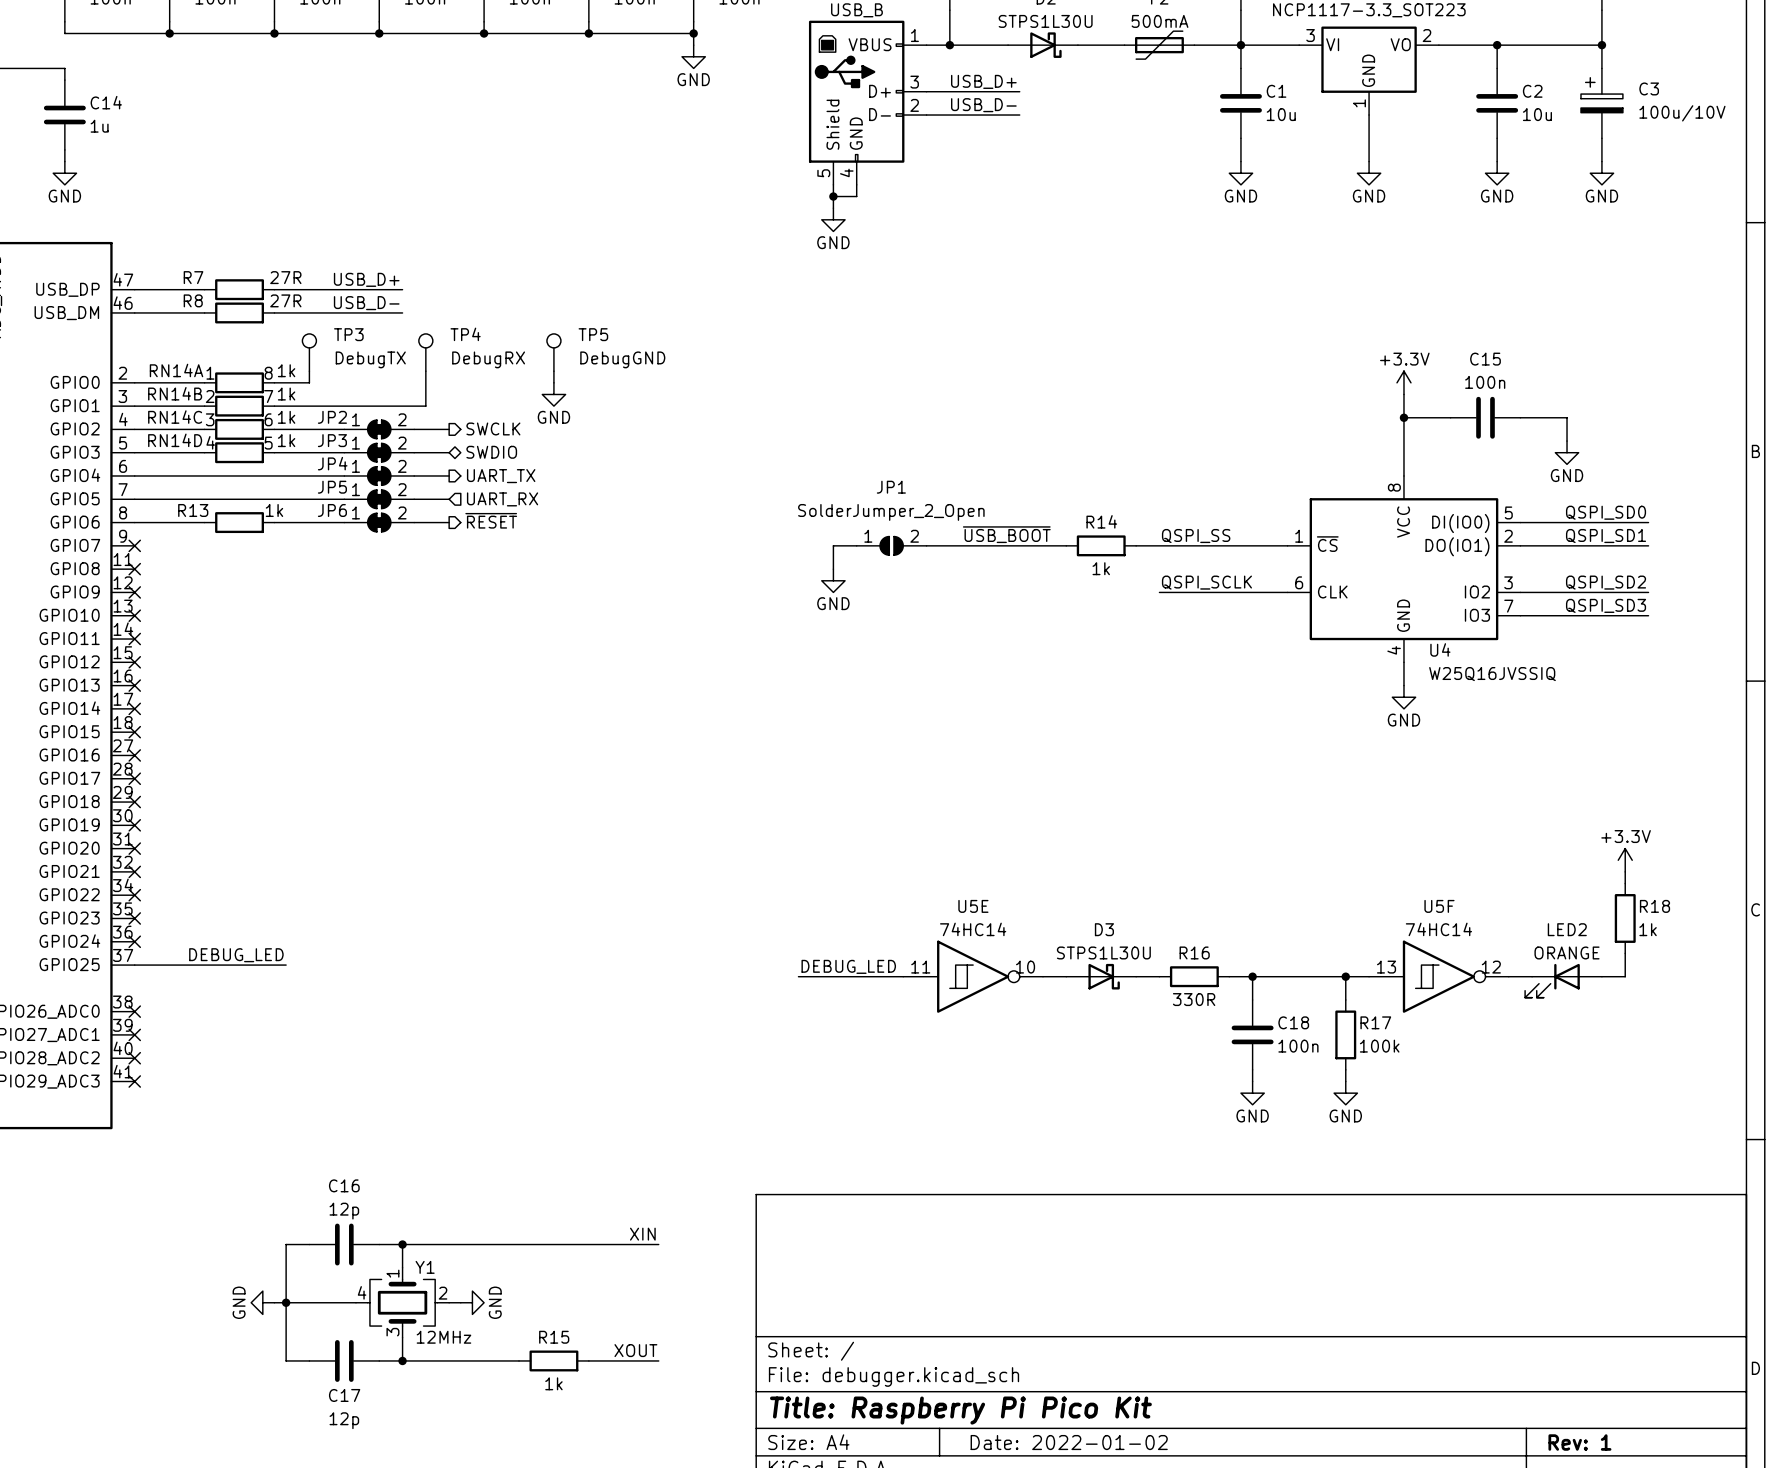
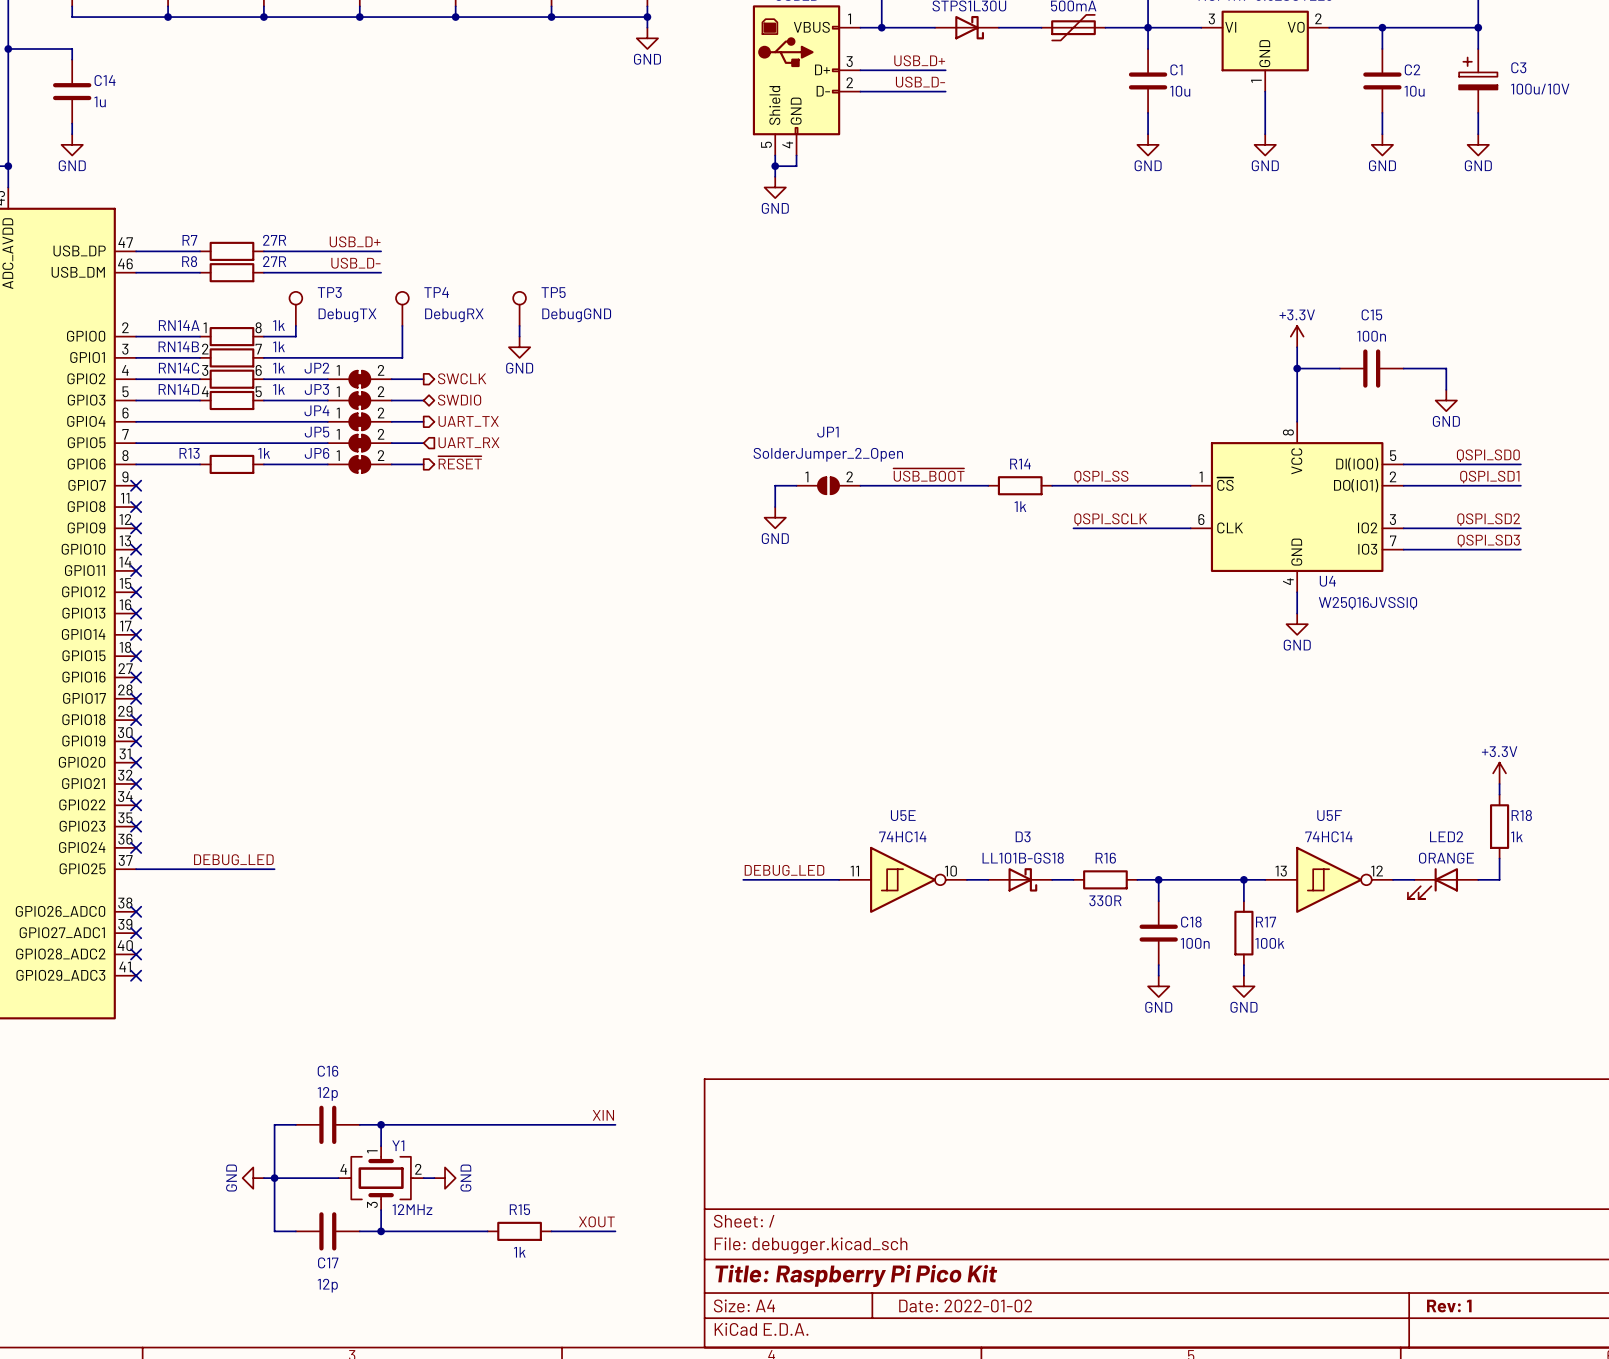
D3 value: STPS1L30U (1103, 952) -> LL101B-GS18 (1023, 858)

